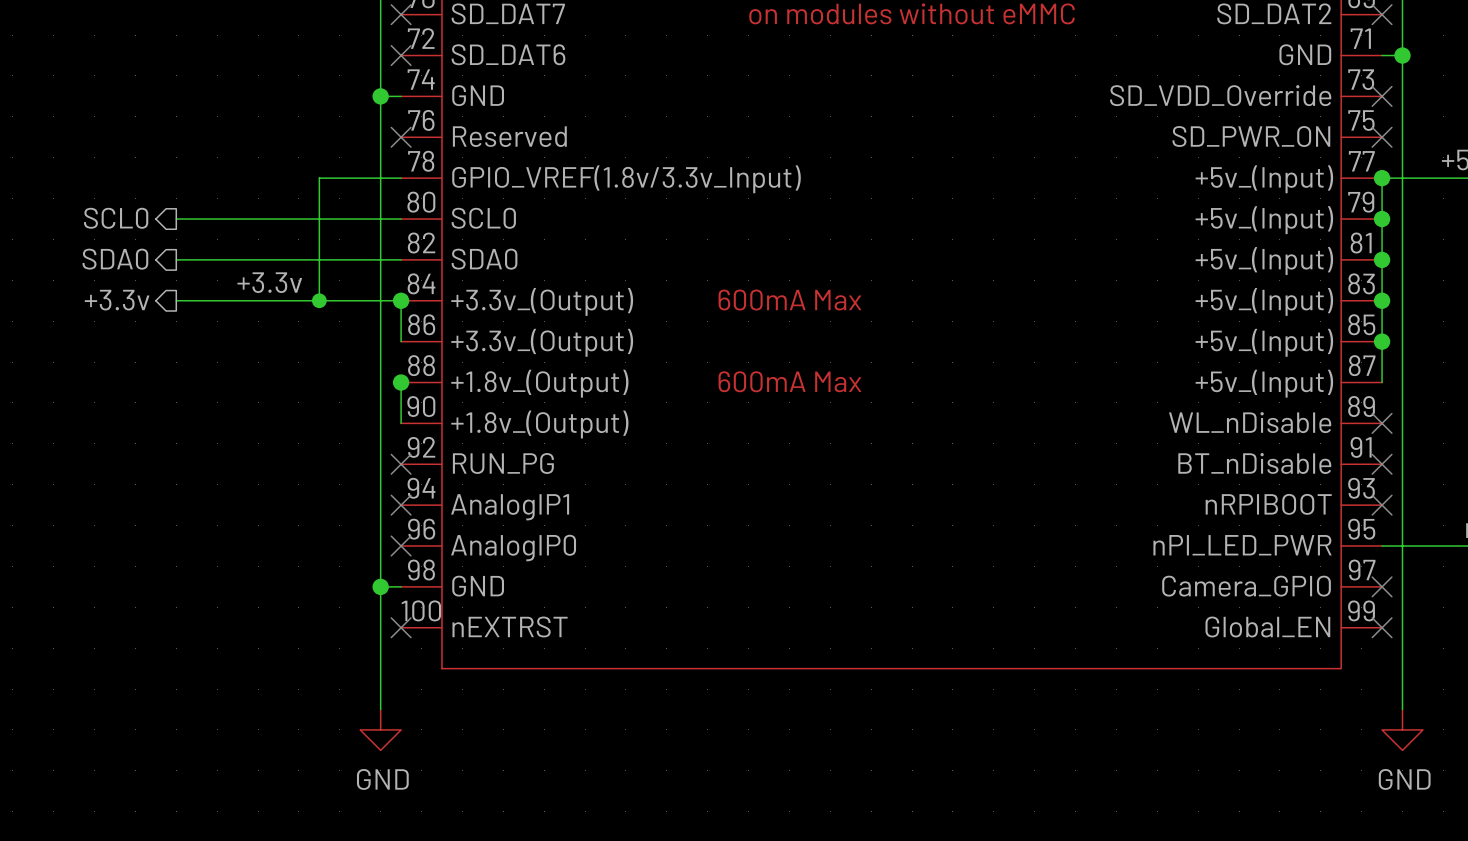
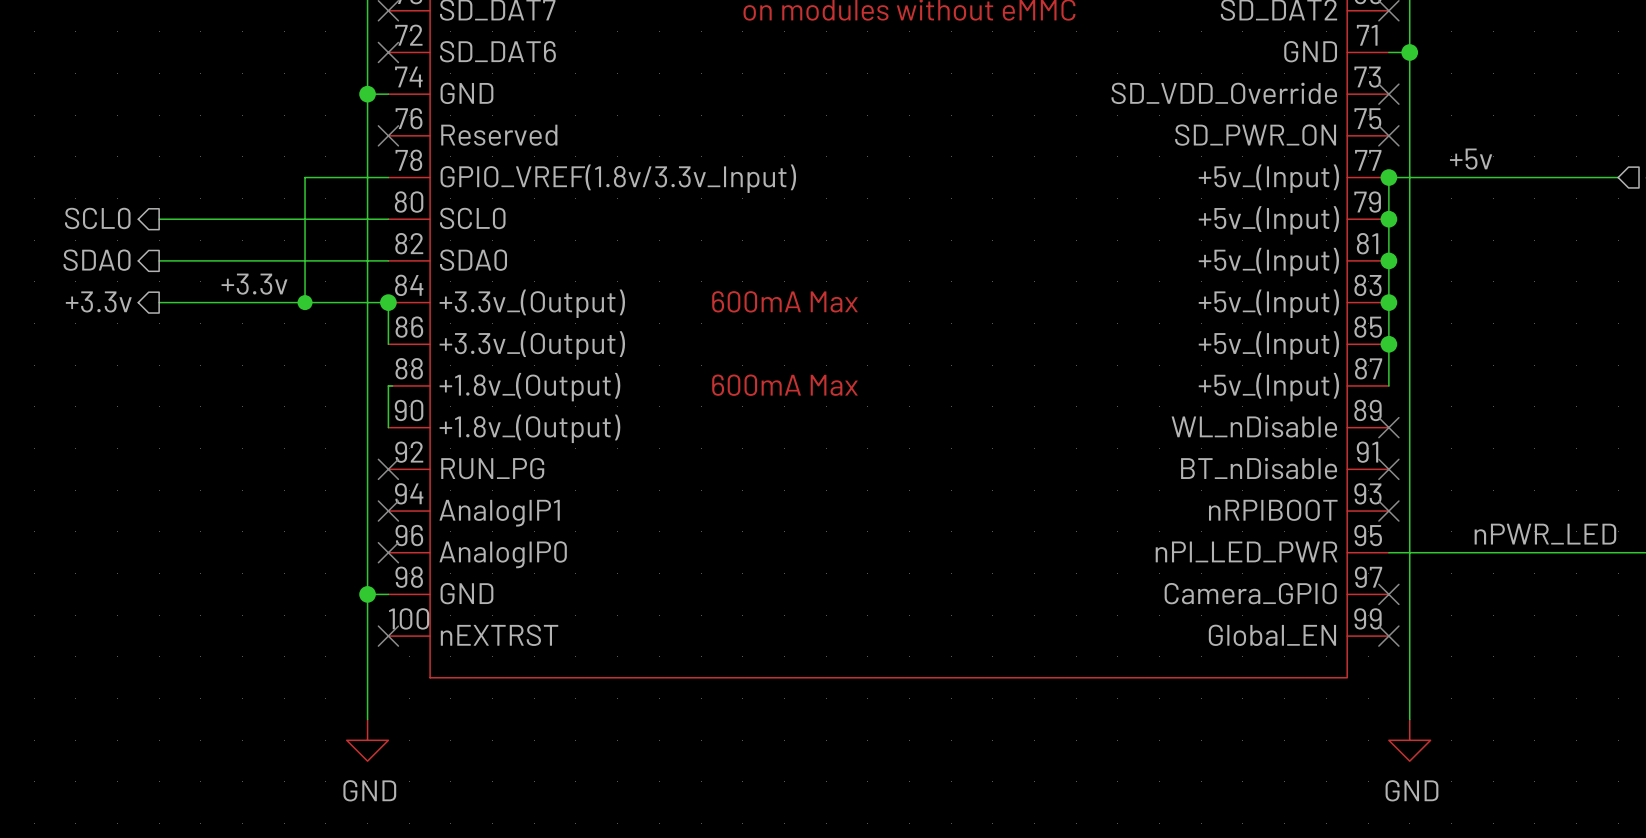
junction: (401, 382) -> none

